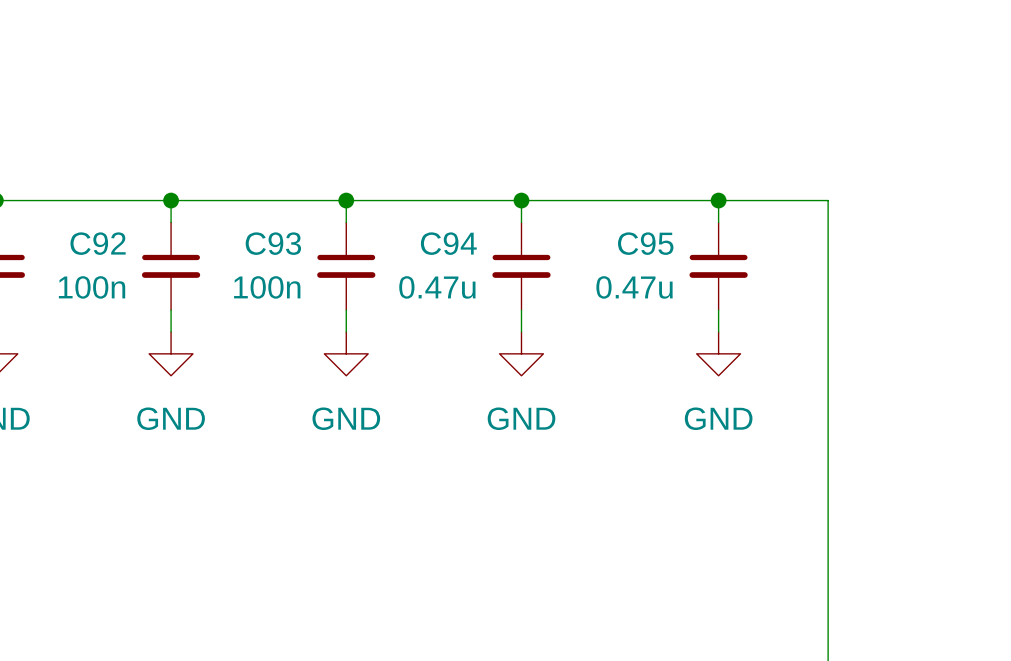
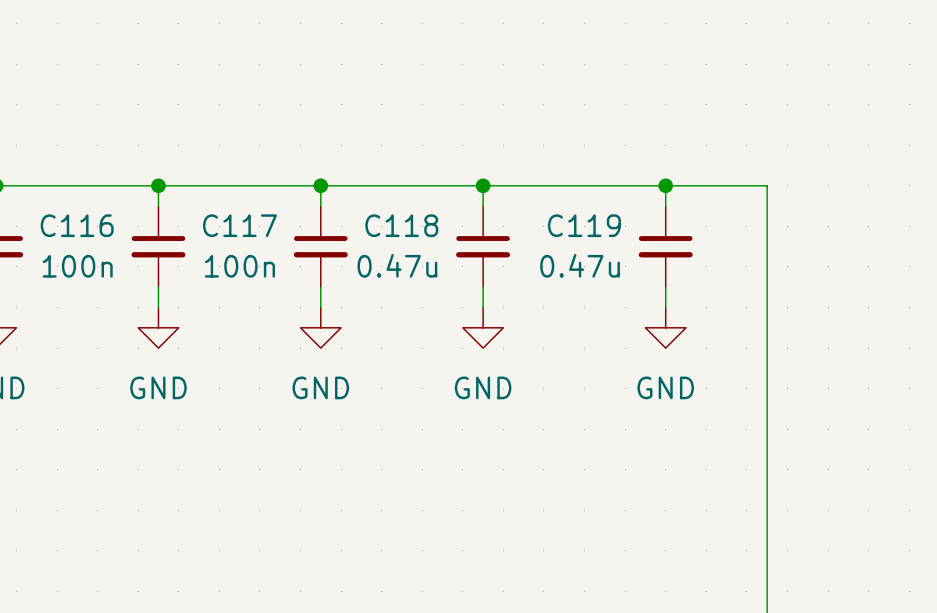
C92 name: C92 (98, 243) -> C116 (77, 225)
C93 name: C93 (273, 243) -> C117 (239, 225)
C94 name: C94 (448, 243) -> C118 (401, 225)
C95 name: C95 (645, 243) -> C119 (584, 225)

